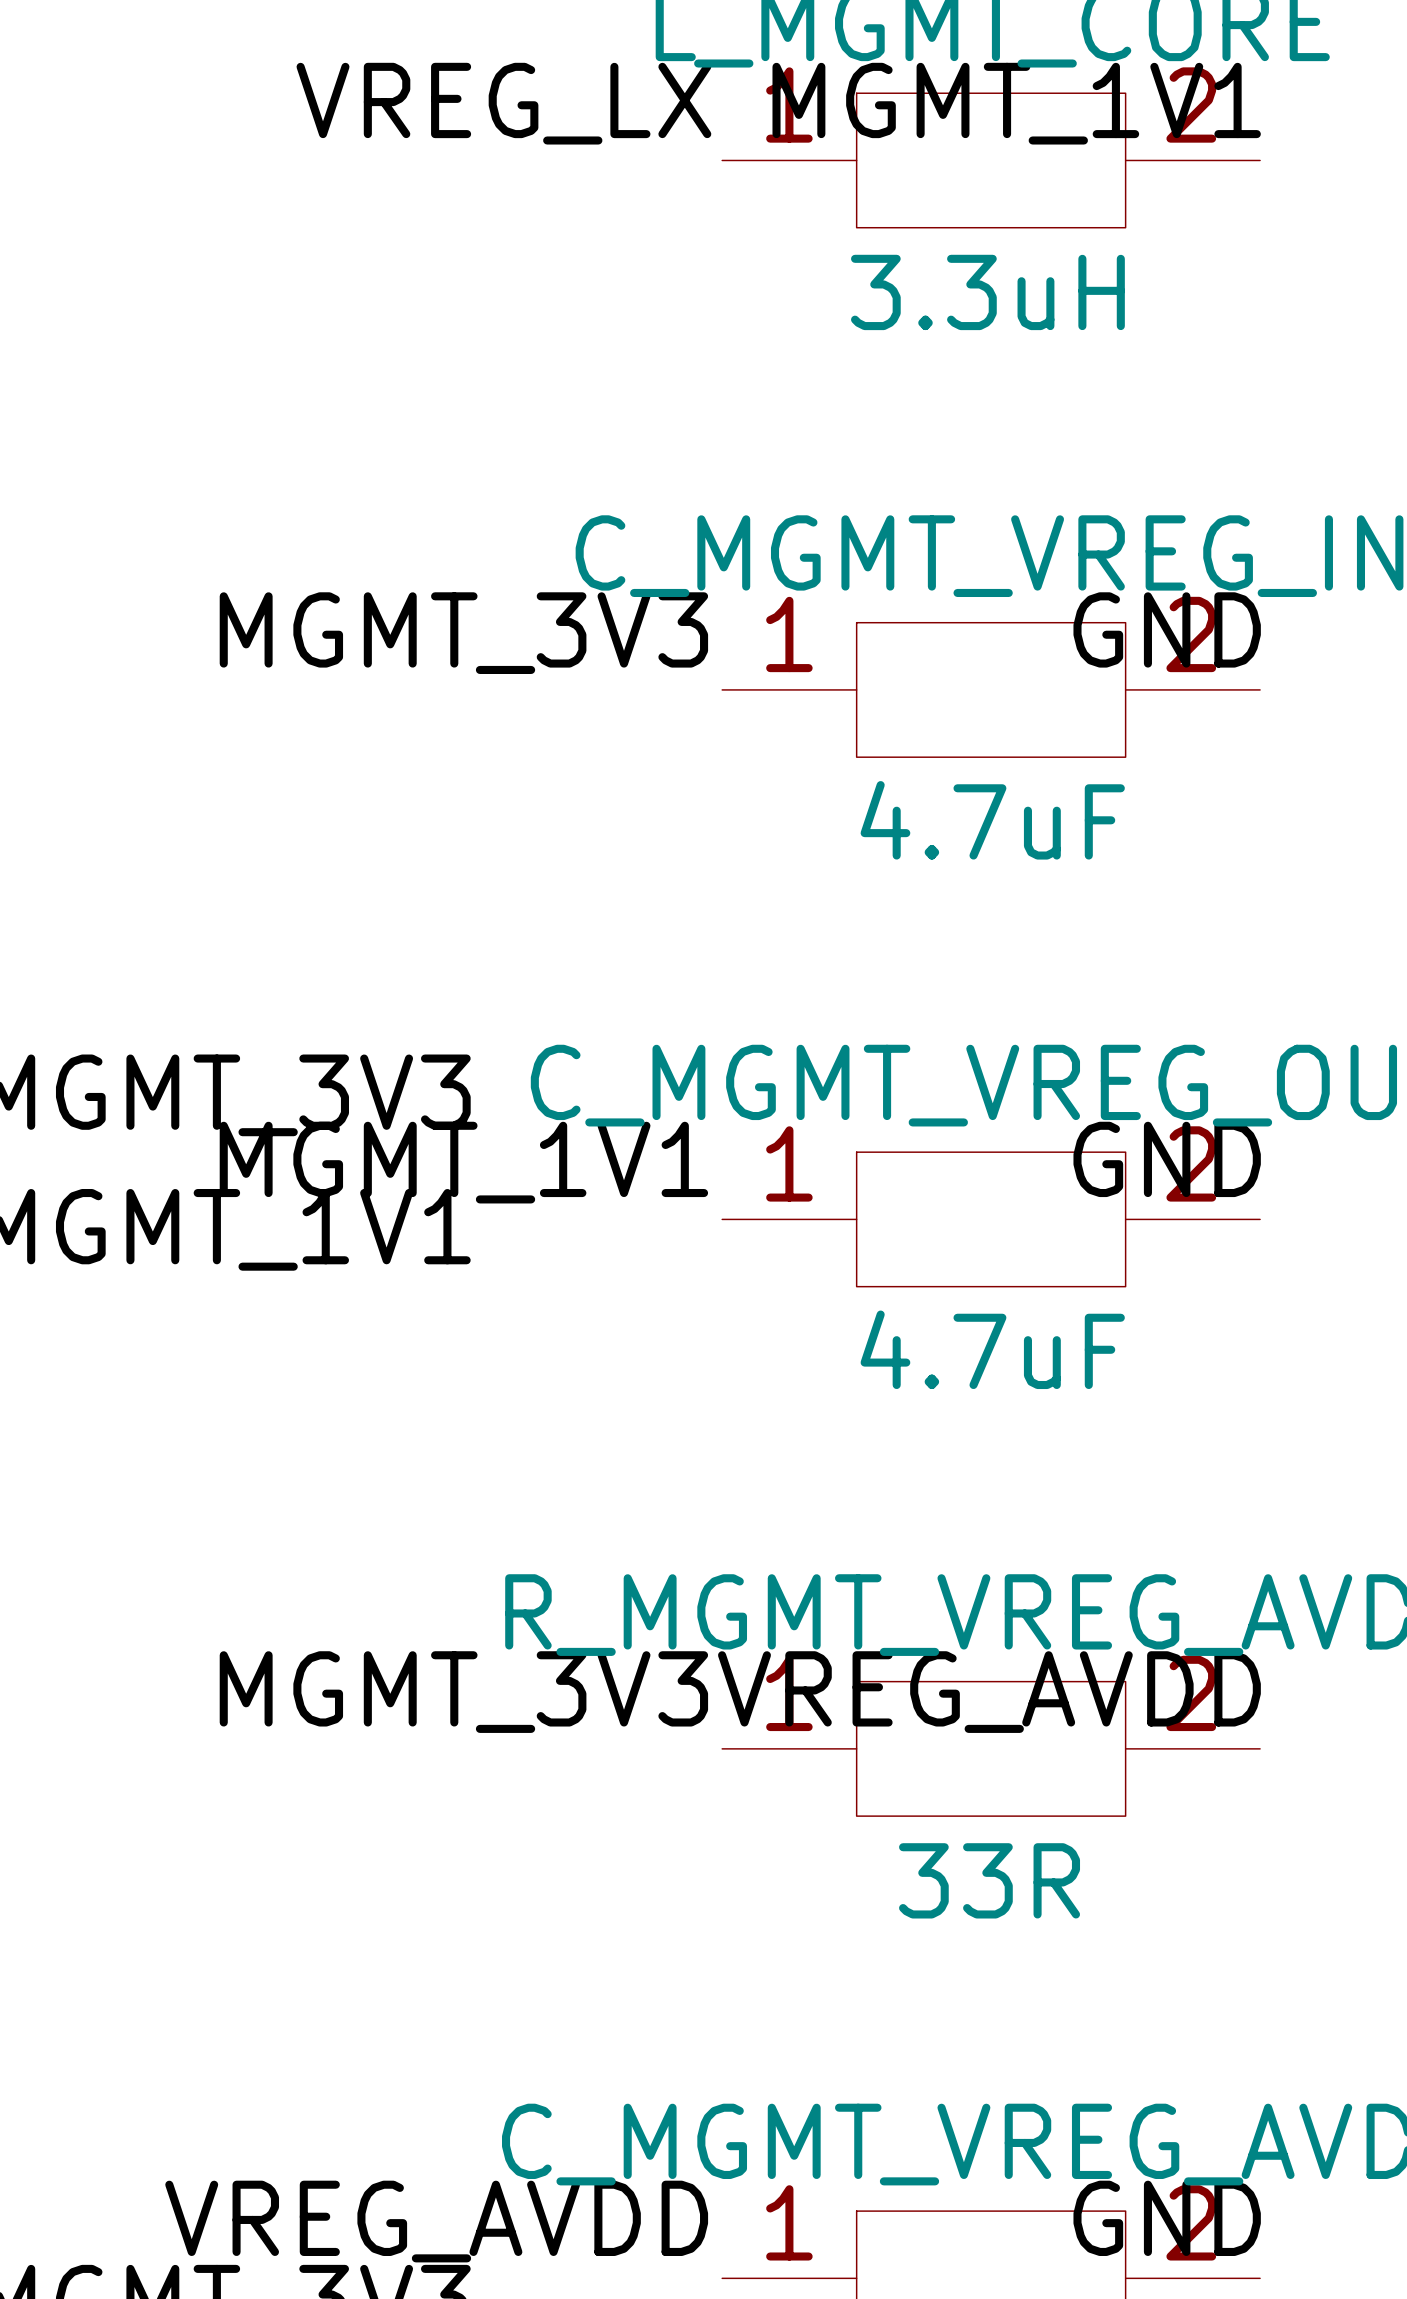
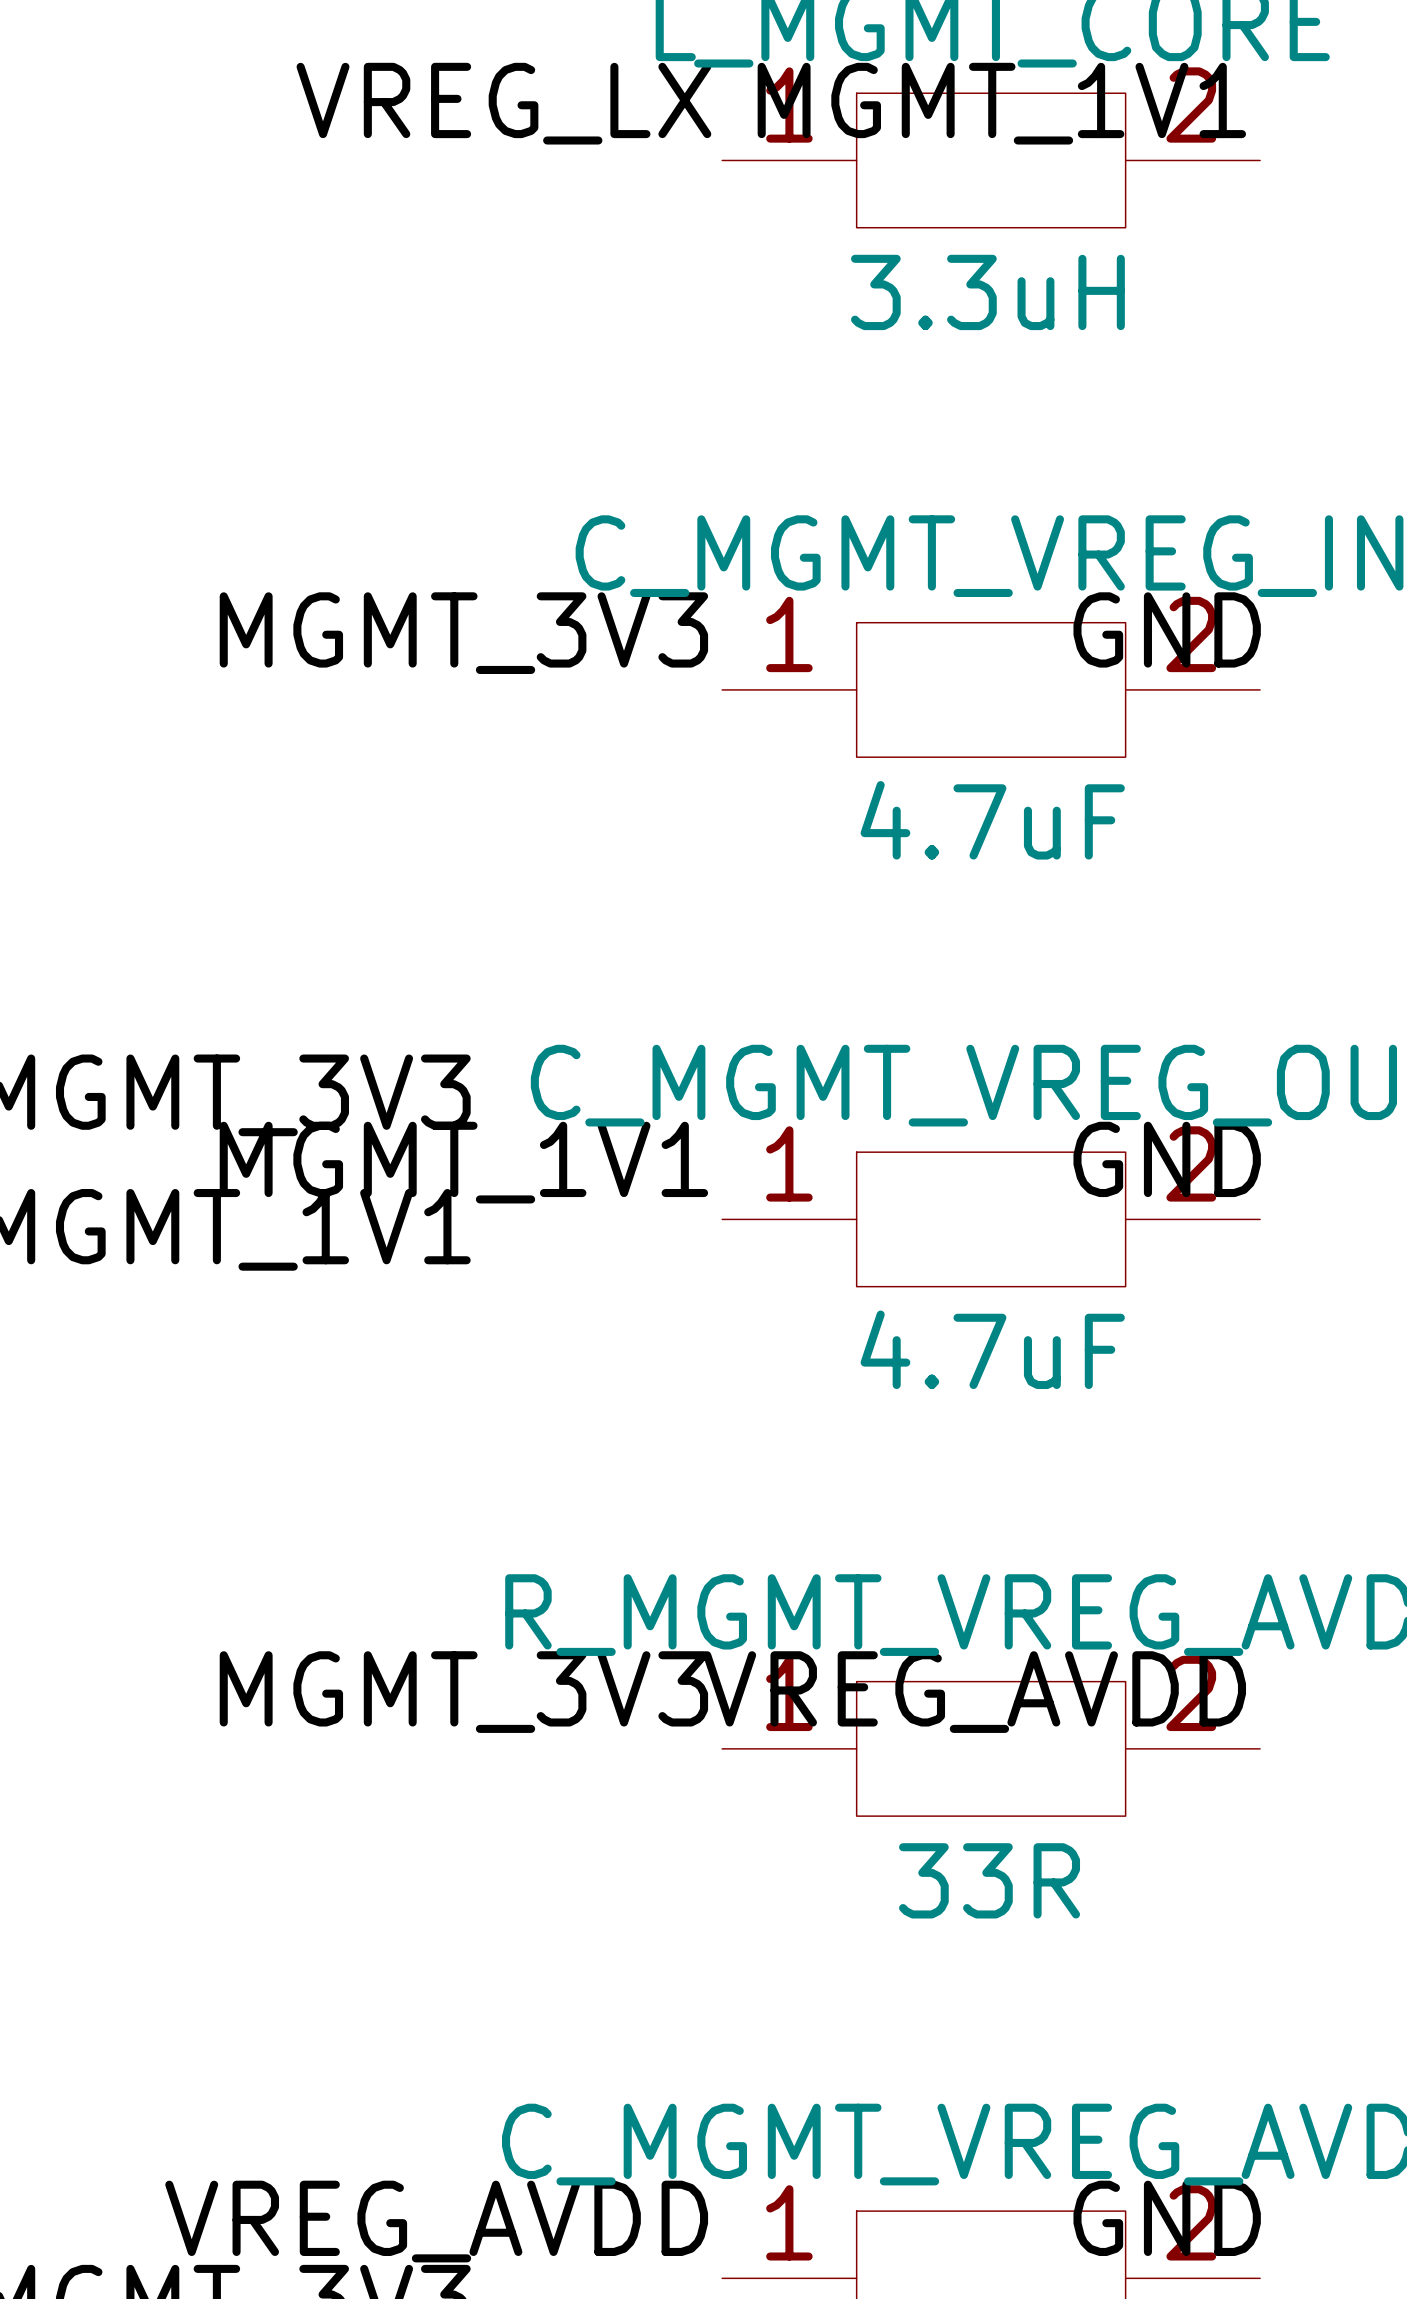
label position: MGMT_1V1 (1016, 103) -> MGMT_1V1 (1001, 103)
label position: VREG_AVDD (989, 1692) -> VREG_AVDD (974, 1692)

